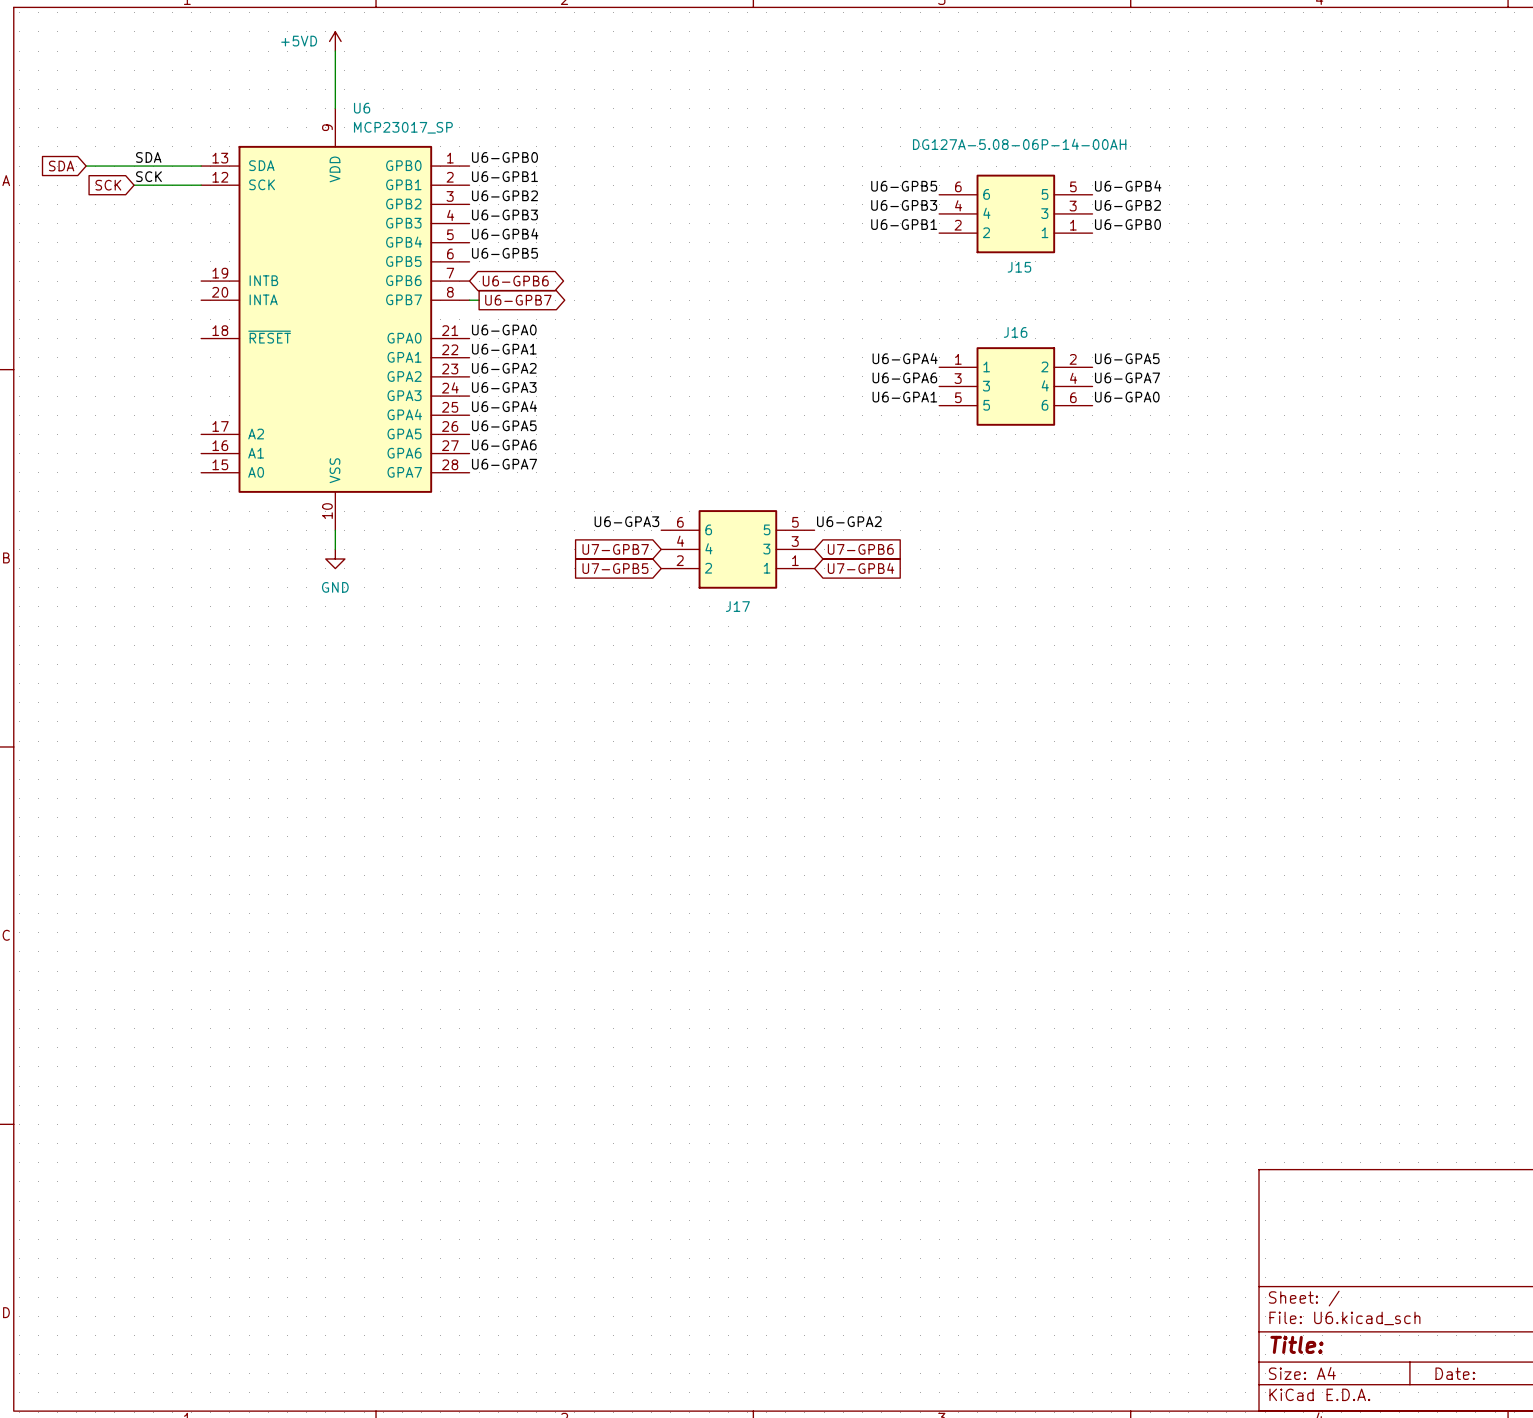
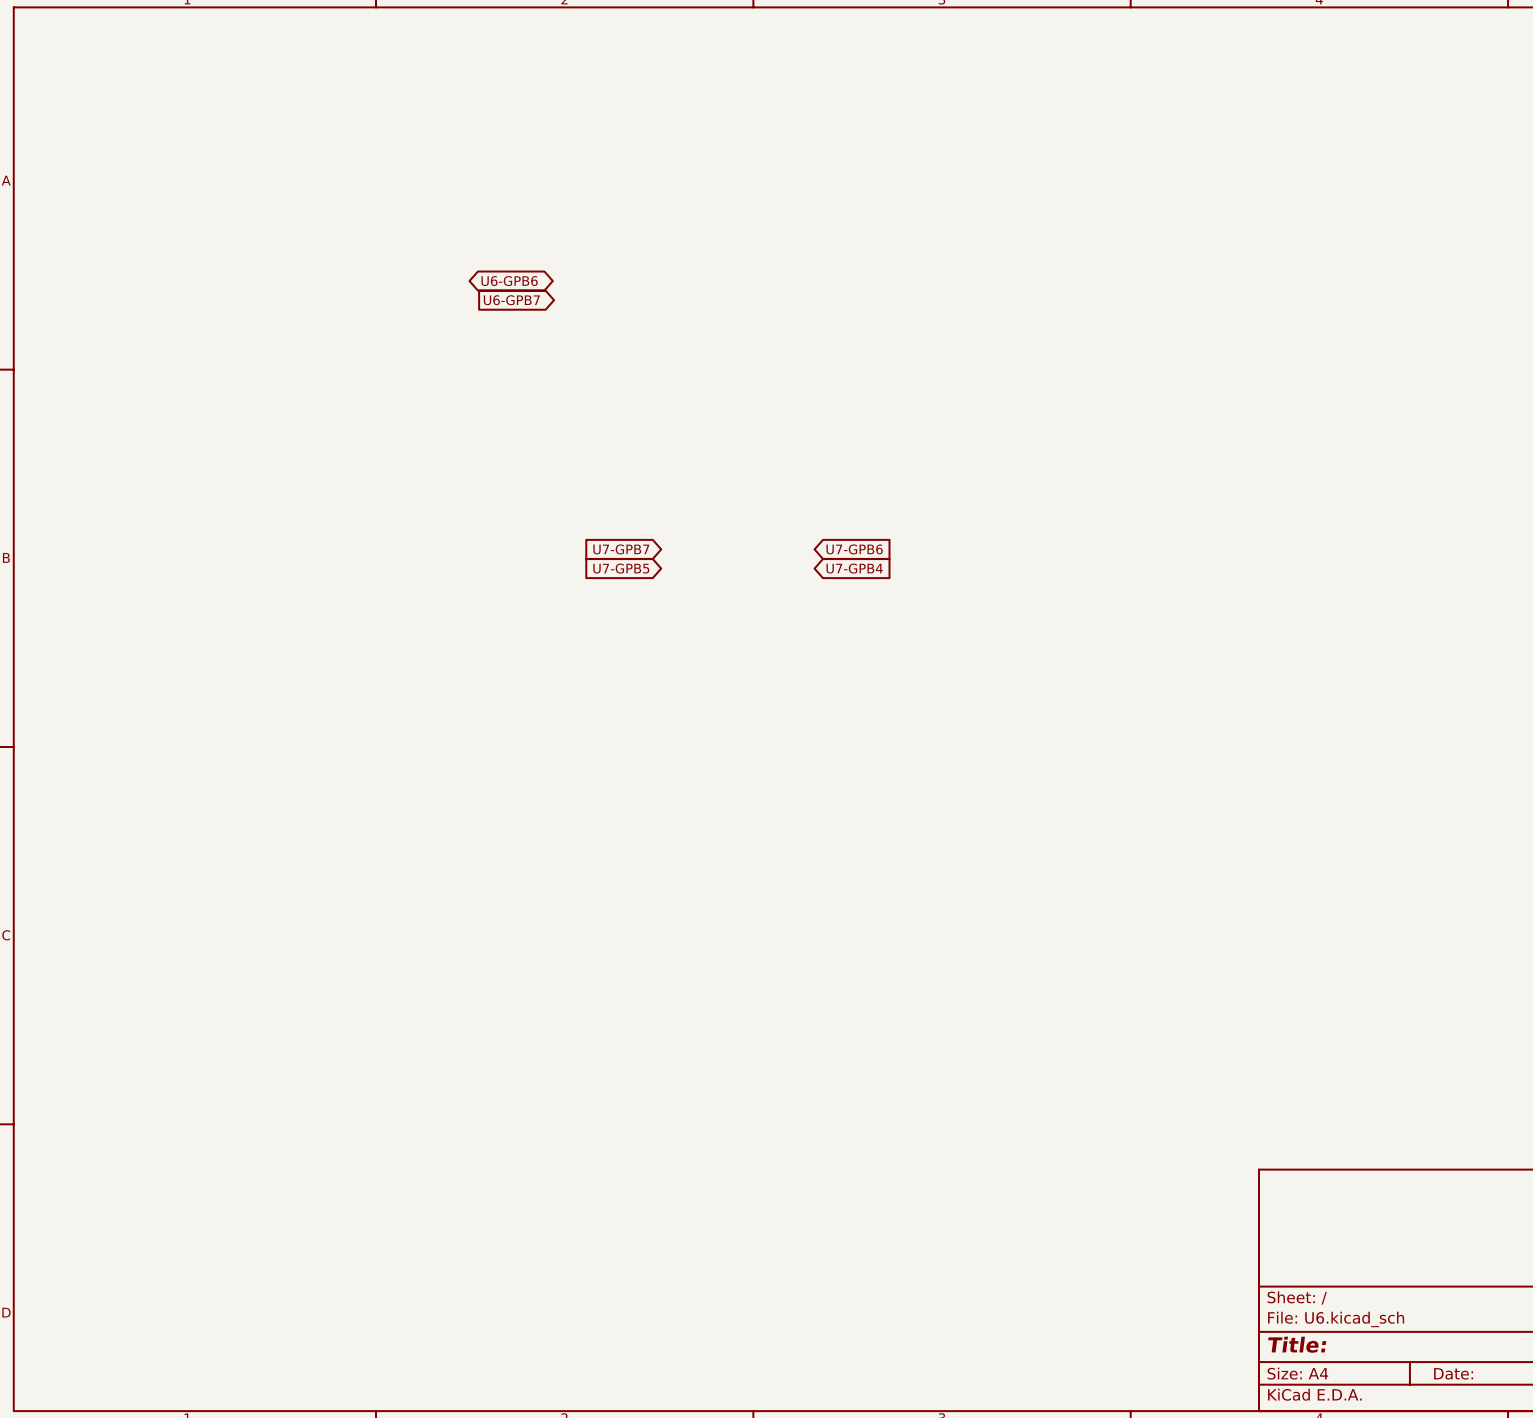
power symbol: +5VD (335, 41) -> none
wire: (335, 51) (335, 108) -> none
label: SDA (148, 157) -> none
label: U6-GPB0 (504, 157) -> none
global label: SDA (61, 166) -> none
wire: (86, 166) (201, 166) -> none
label: SCK (148, 176) -> none
label: U6-GPB1 (504, 176) -> none
global label: SCK (108, 185) -> none
wire: (134, 185) (201, 185) -> none
label: U6-GPB5 (904, 186) -> none
label: U6-GPB4 (1128, 186) -> none
label: U6-GPB2 (504, 195) -> none
label: U6-GPB3 (904, 205) -> none
label: U6-GPB2 (1127, 205) -> none
J15: DG127A-5.08-06P-14-00AH (1015, 213) -> none
label: U6-GPB3 (504, 214) -> none
label: U6-GPB1 (904, 224) -> none
label: U6-GPB0 (1127, 224) -> none
label: U6-GPB4 (505, 233) -> none
label: U6-GPB5 (504, 253) -> none
wire: (469, 300) (479, 300) -> none
U6: MCP23017_SP (335, 319) -> none
label: U6-GPA0 (504, 330) -> none
label: U6-GPA1 (504, 349) -> none
label: U6-GPA4 (905, 358) -> none
label: U6-GPA5 (1127, 358) -> none
label: U6-GPA2 (504, 368) -> none
label: U6-GPA6 (904, 377) -> none
label: U6-GPA7 (1127, 377) -> none
J16: (1015, 386) -> none
label: U6-GPA3 (504, 387) -> none
label: U6-GPA1 (904, 397) -> none
label: U6-GPA0 (1127, 397) -> none
label: U6-GPA4 (504, 406) -> none
label: U6-GPA5 (504, 425) -> none
label: U6-GPA6 (504, 445) -> none
label: U6-GPA7 (504, 464) -> none
label: U6-GPA3 (626, 521) -> none
label: U6-GPA2 (849, 521) -> none
wire: (335, 530) (335, 549) -> none
J17: (737, 549) -> none
power symbol: GND (335, 558) -> none

